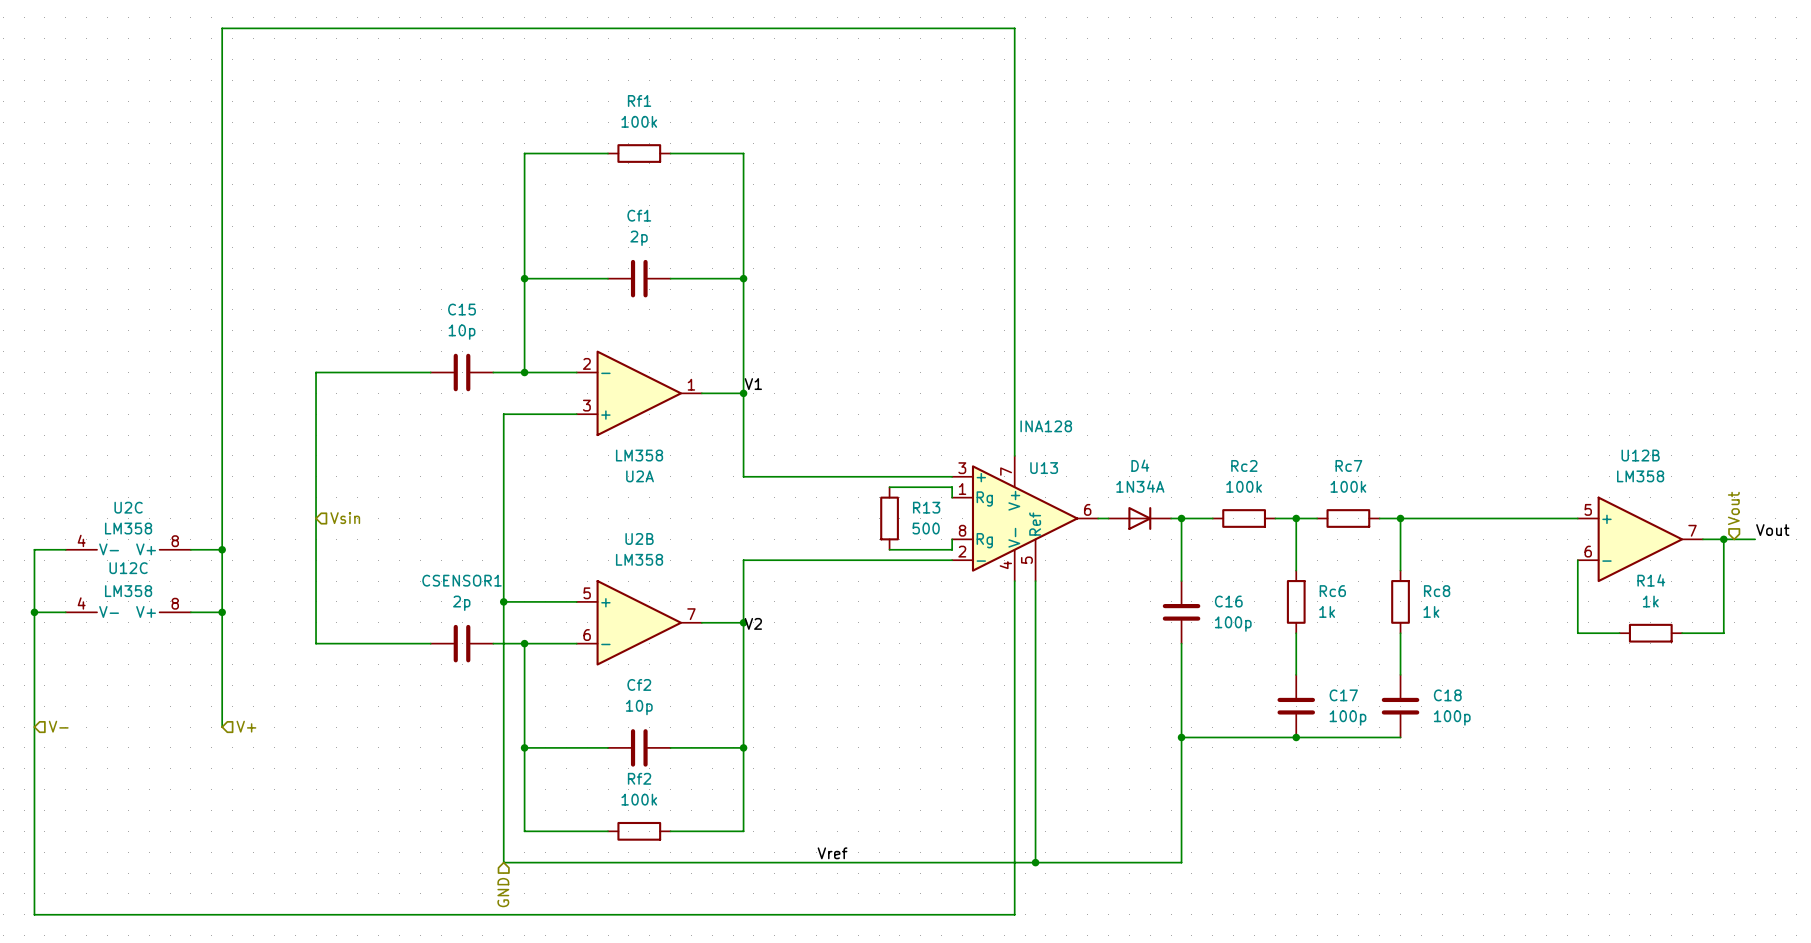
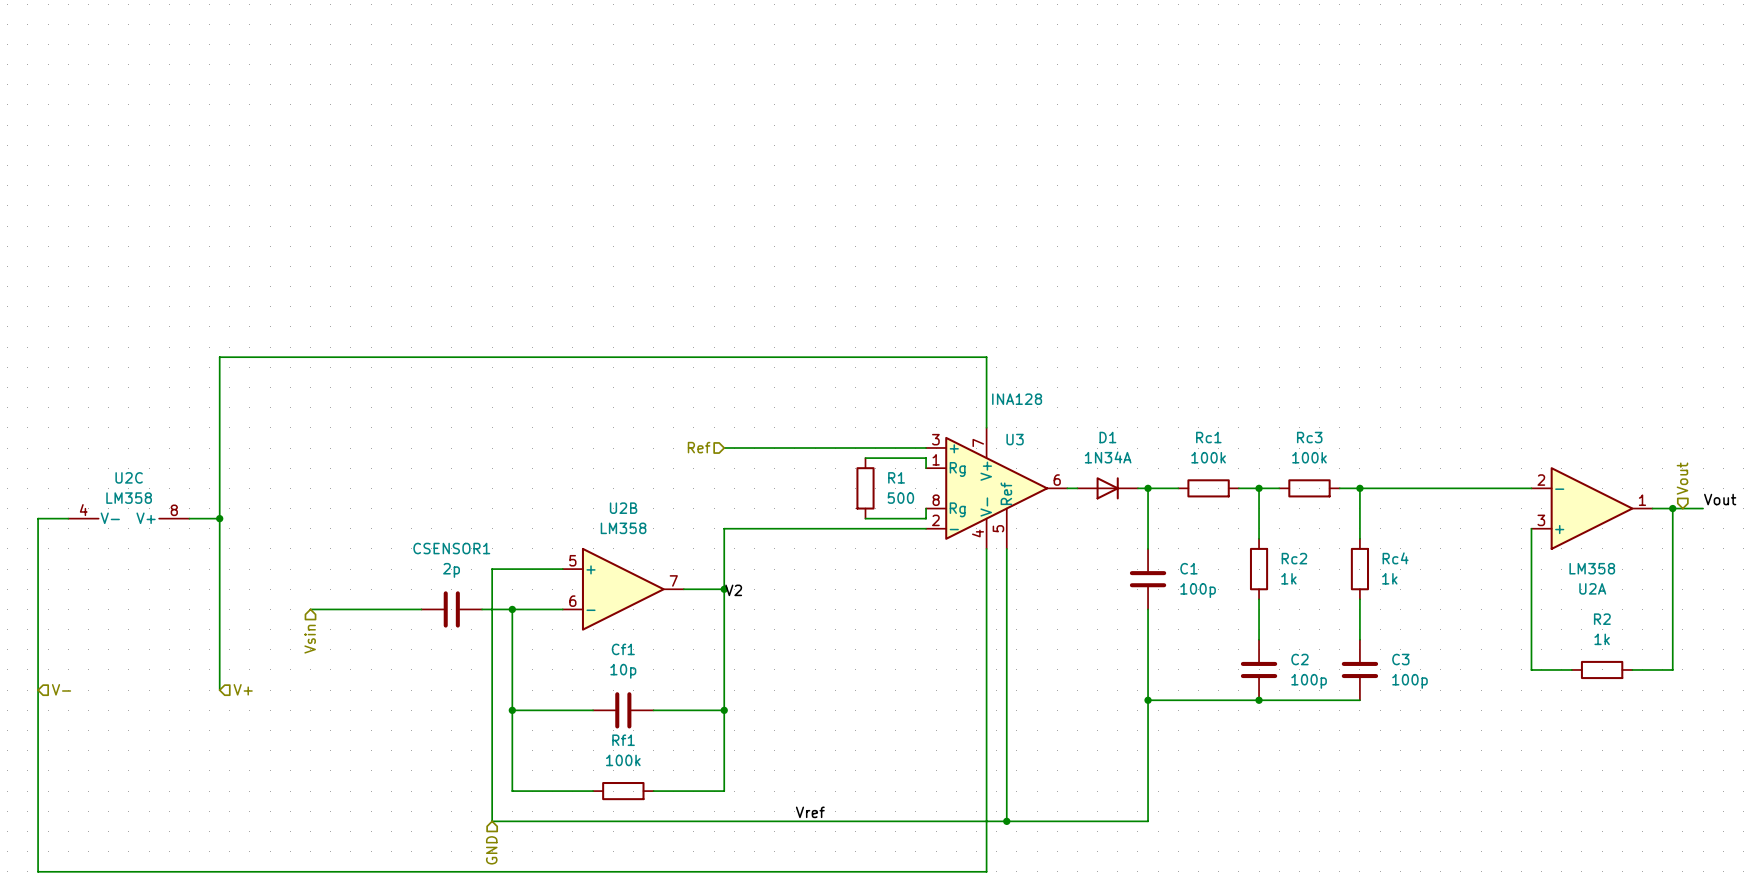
wire: (608, 153) (524, 153) (524, 372) -> none
Rf1: 100k (639, 153) -> none
wire: (670, 153) (743, 153) (743, 476) -> none
wire: (524, 278) (608, 278) -> none
junction: (524, 278) -> none
Cf1: 2p (639, 278) -> none
wire: (670, 278) (743, 278) -> none
junction: (743, 278) -> none
wire: (430, 372) (316, 372) (316, 643) -> none
C15: 10p (462, 372) -> none
wire: (493, 372) (576, 372) -> none
junction: (524, 372) -> none
wire: (222, 382) (222, 28) (1014, 28) (1014, 382) -> (219, 357) (986, 357)
label: V1 (753, 384) -> none
U2A position: (639, 393) -> (1592, 508)
wire: (701, 393) (743, 393) -> none
junction: (743, 393) -> none
wire: (576, 414) (503, 414) (503, 601) -> none
D4 name: D4 (1140, 465) -> D1 (1107, 437)
Rc2 name: Rc2 (1244, 465) -> Rc1 (1208, 437)
Rc7 name: Rc7 (1348, 465) -> Rc3 (1309, 437)
U13 name: U13 (1044, 468) -> U3 (1015, 439)
hierarchical label: none -> Ref (699, 447)
R13 name: R13 (926, 507) -> R1 (896, 477)
hierarchical label rotation: 0° (345, 518) -> 90° clockwise (310, 639)
hierarchical label position: Vsin (345, 518) -> Vsin (310, 639)
U12B: LM358 (1640, 539) -> none
Rc6 name: Rc6 (1332, 591) -> Rc2 (1294, 558)
Rc8 name: Rc8 (1437, 591) -> Rc4 (1395, 558)
junction: (503, 601) -> none
C16 name: C16 (1228, 601) -> C1 (1188, 568)
wire: (34, 612) (65, 612) -> none
junction: (34, 612) -> none
U12C: LM358 (128, 612) -> none
wire: (190, 612) (222, 612) -> none
junction: (222, 612) -> none
wire: (1577, 633) (1619, 633) -> (1531, 599) (1531, 669) (1571, 669)
R14: 1k (1650, 633) -> none
wire: (1682, 633) (1723, 633) -> (1632, 669) (1672, 669) (1672, 599)
Cf2 name: Cf2 (639, 684) -> Cf1 (623, 649)
C17 name: C17 (1343, 695) -> C2 (1299, 659)
C18 name: C18 (1447, 695) -> C3 (1400, 659)
R2: none -> 1k (1602, 669)
Rf2 name: Rf2 (639, 778) -> Rf1 (623, 740)

